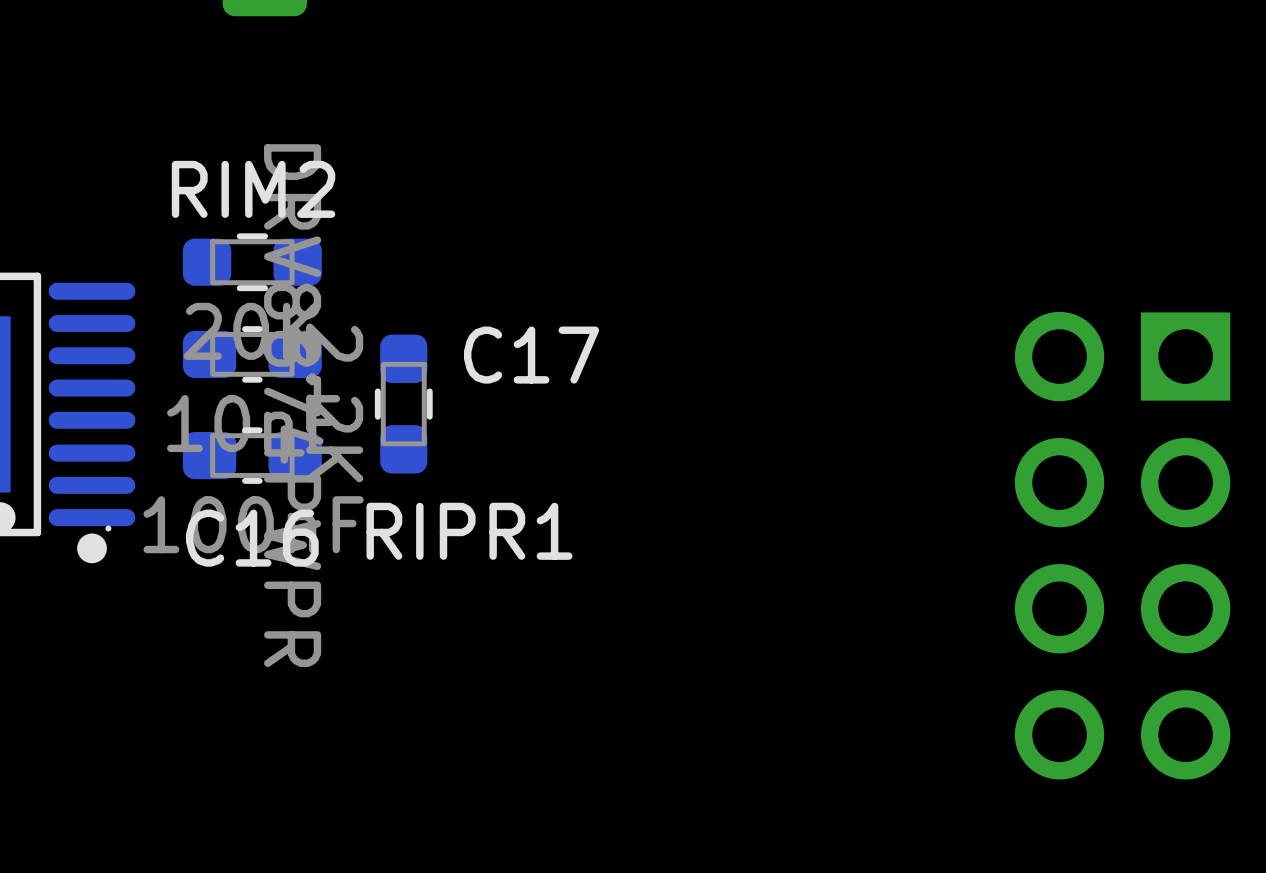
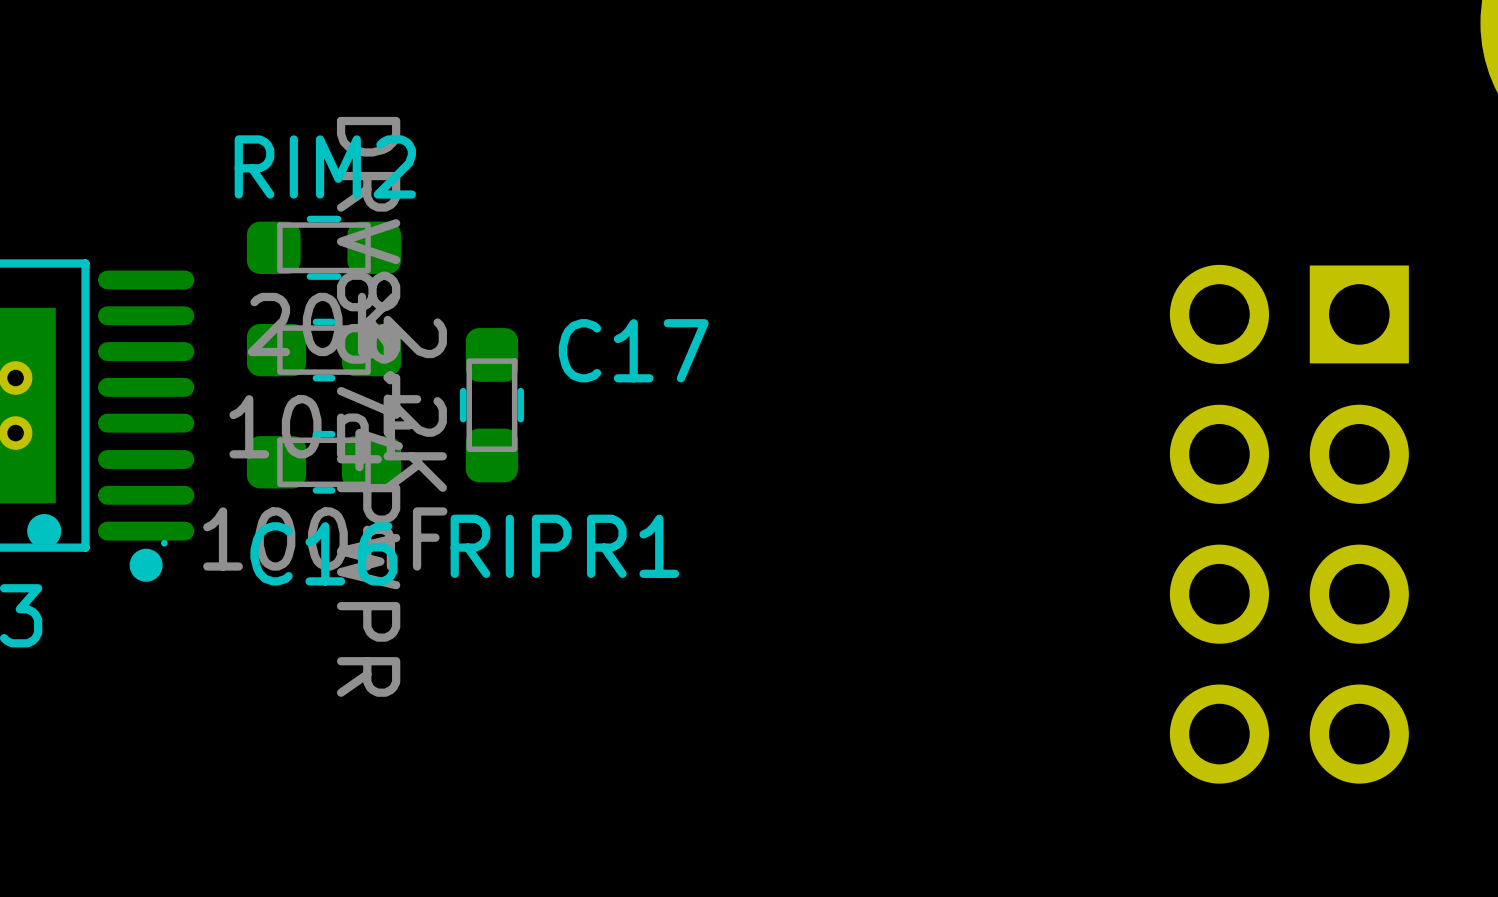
part position: (1122, 545) -> (1289, 524)

